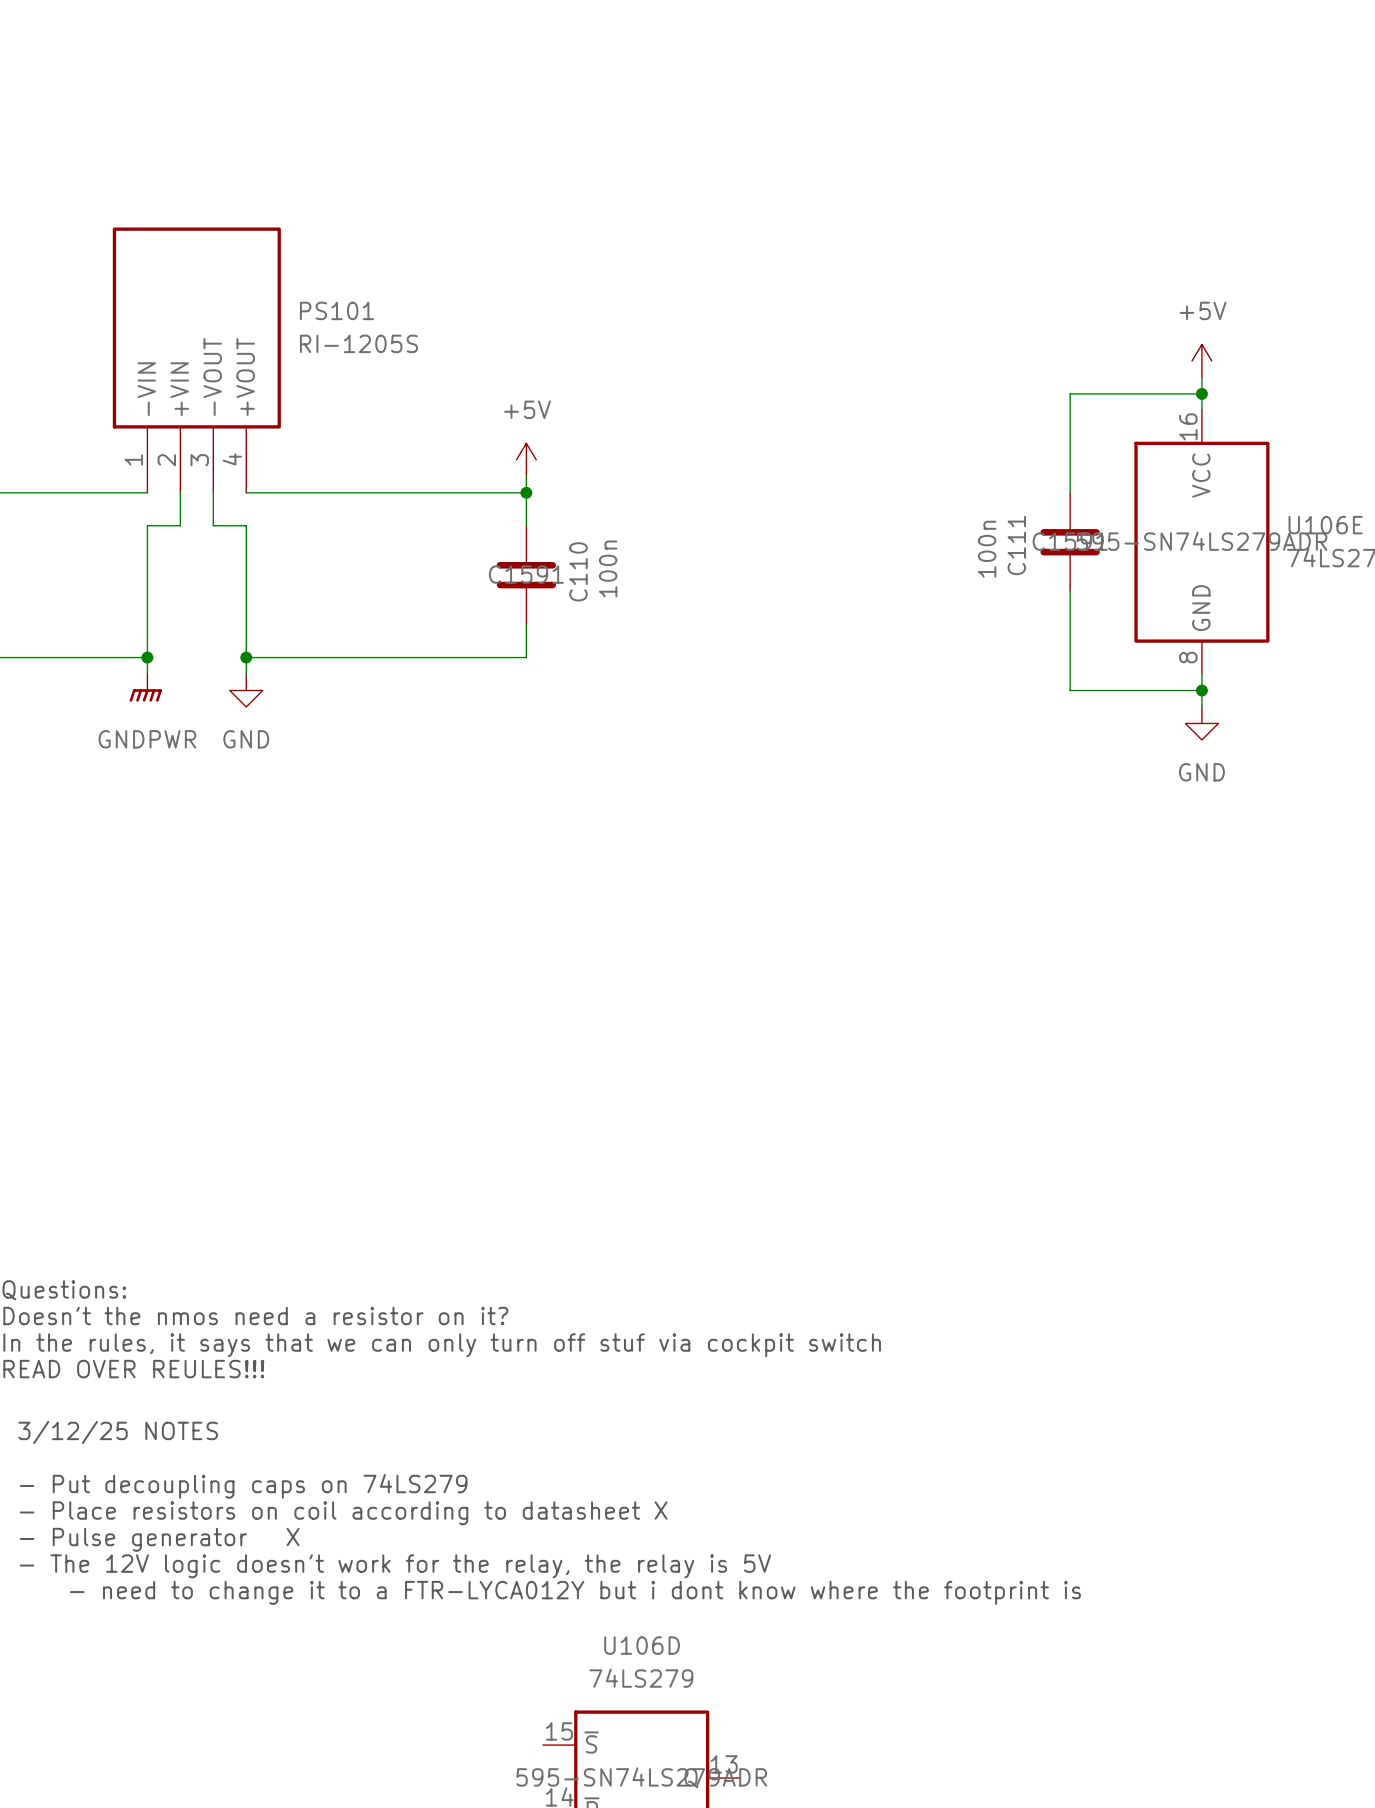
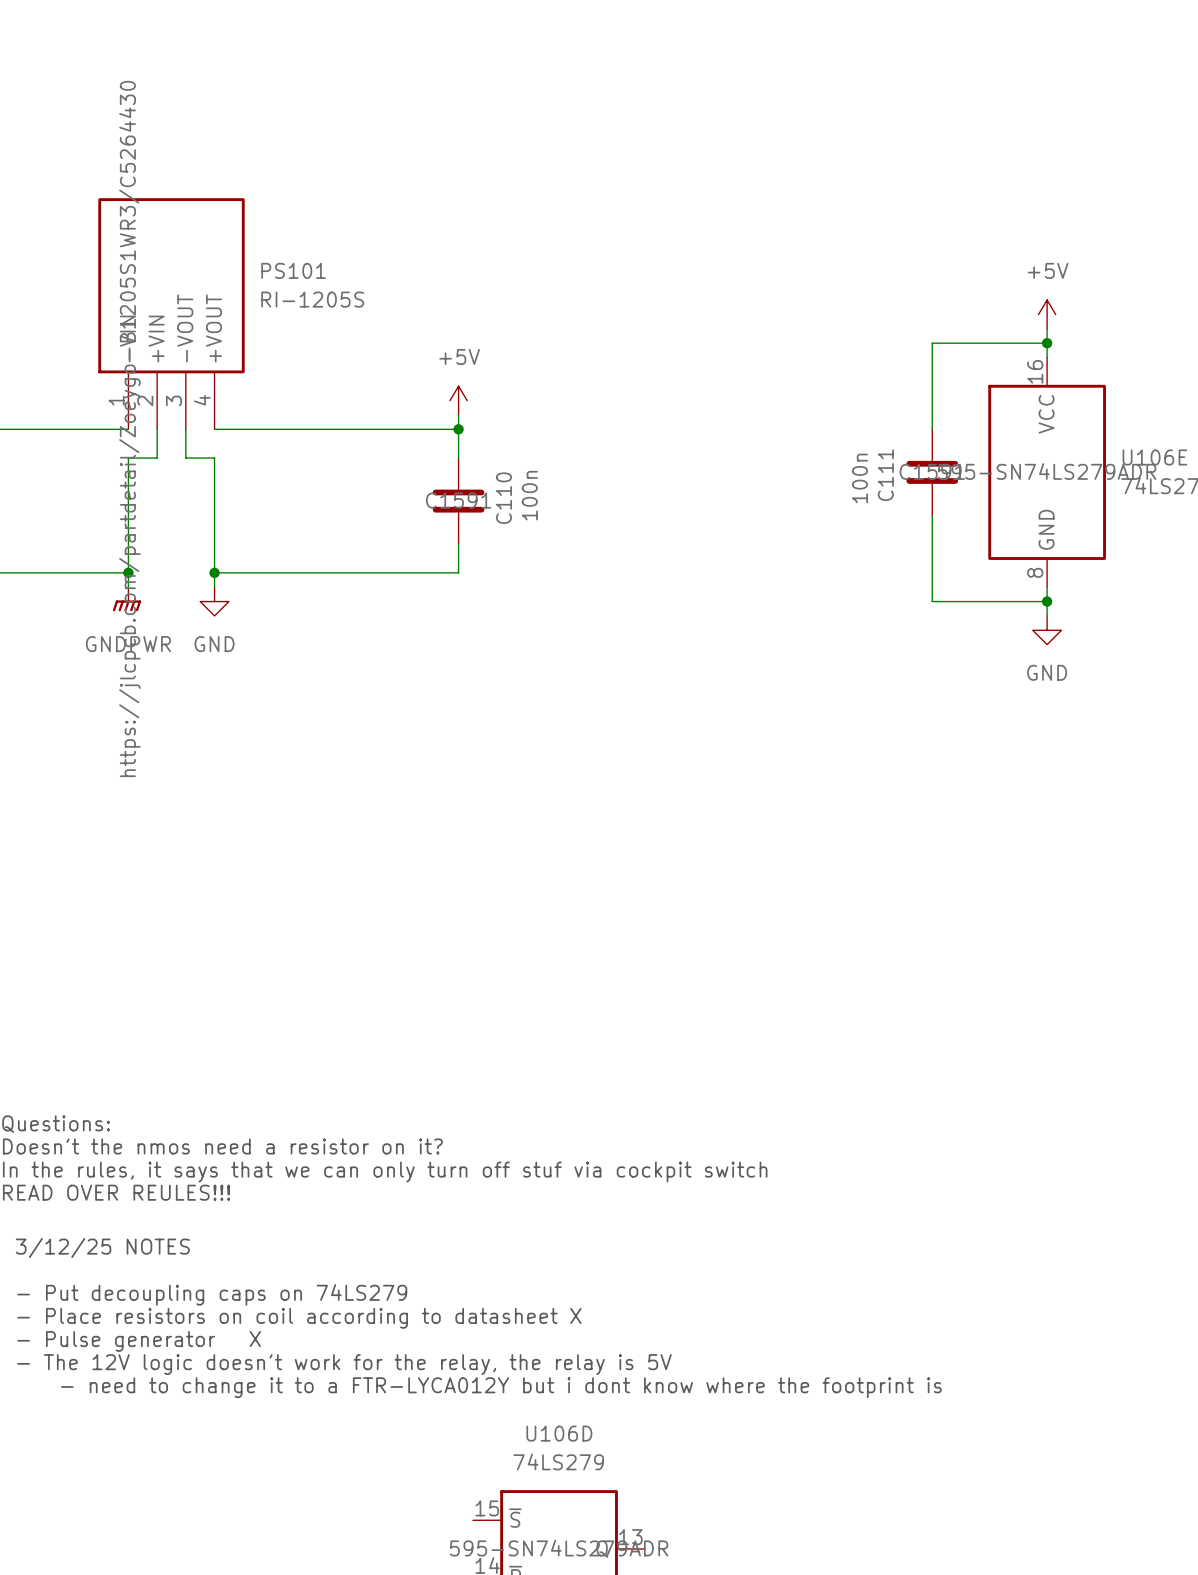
PS101 text: none -> https://jlcpcb.com/partdetail/Zoeygo-B1205S1WR3/C5264430 (129, 428)

